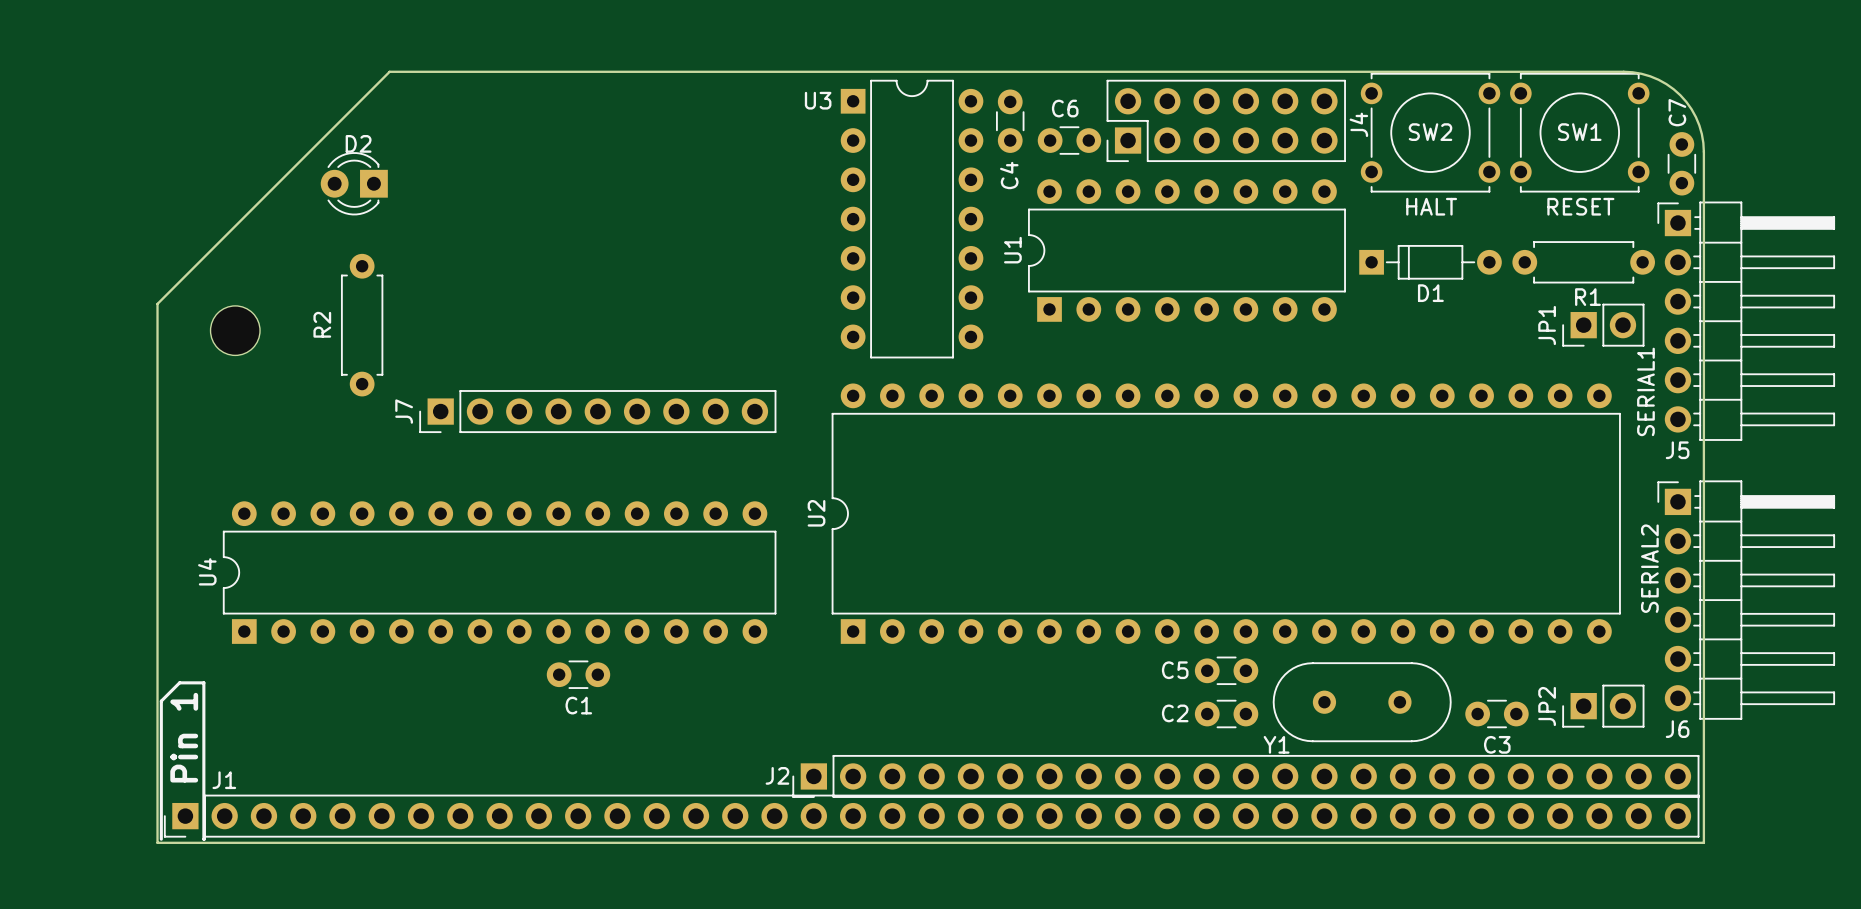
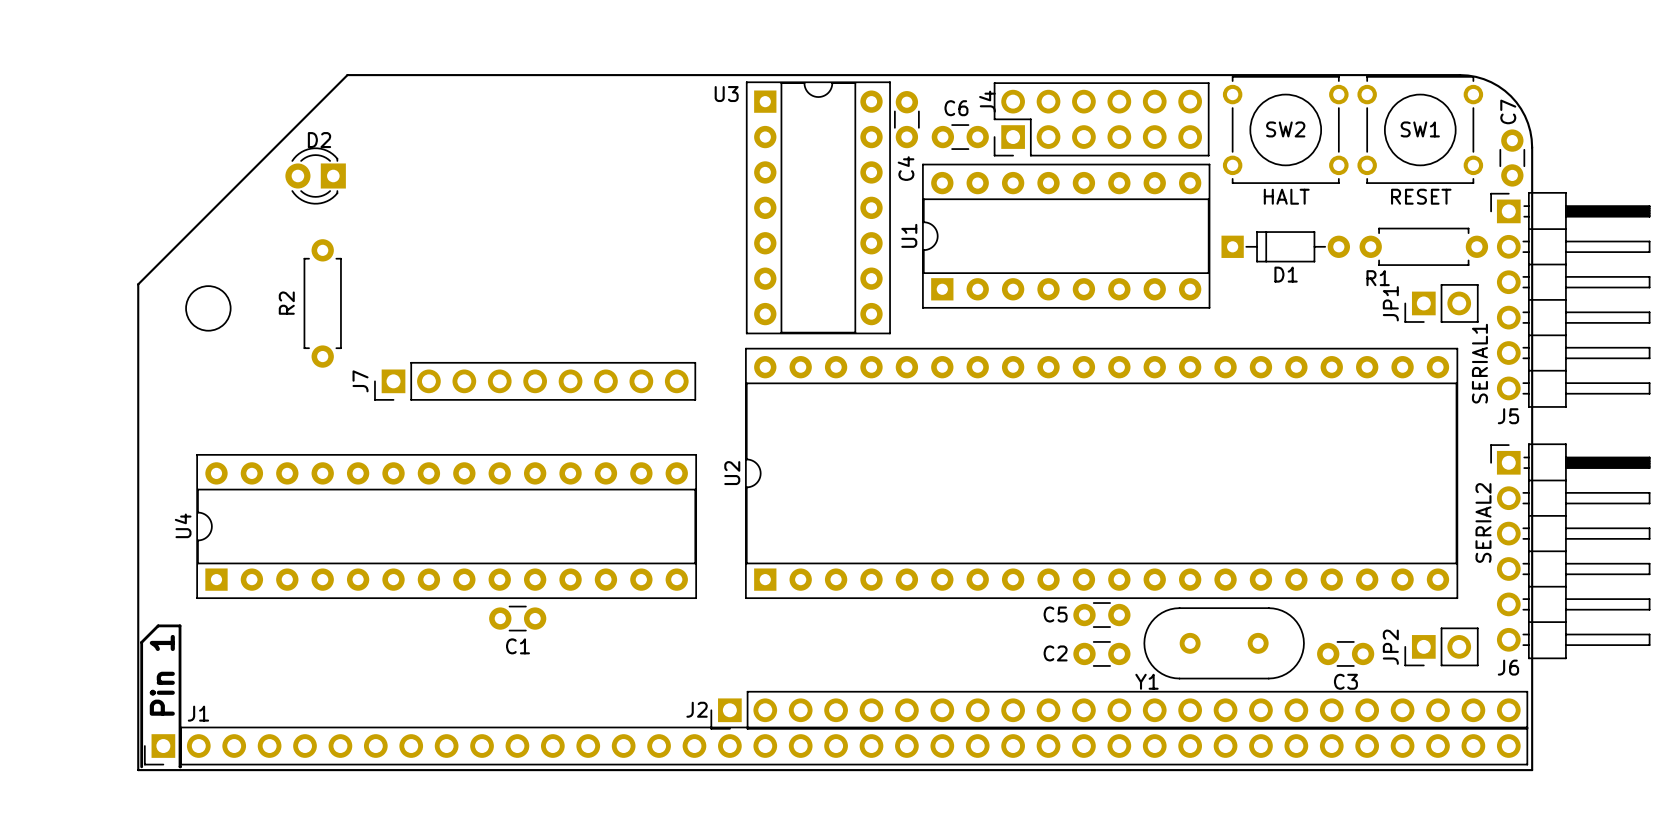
U3 footprint: [840, 79, 984, 359] -> [745, 81, 891, 335]
J4 name position: J4 (1358, 124) -> J4 (987, 101)
U1 footprint: [1028, 179, 1346, 322] -> [922, 163, 1211, 309]
R1 name position: R1 (1587, 297) -> R1 (1378, 278)
U2 footprint: [831, 383, 1621, 644] -> [745, 347, 1459, 599]
U4 footprint: [222, 501, 777, 644] -> [196, 454, 697, 599]

